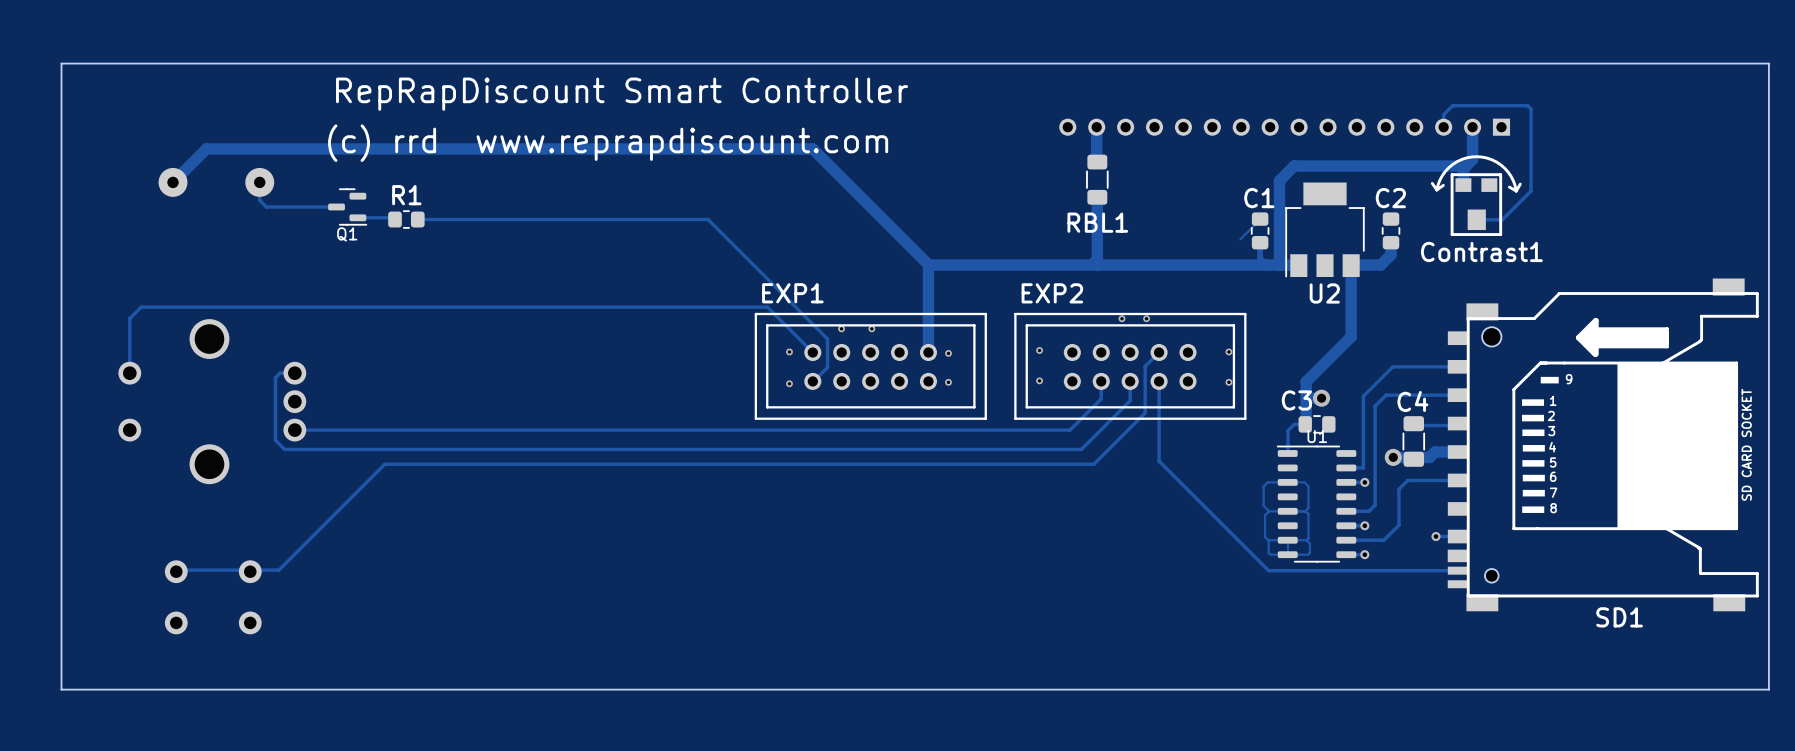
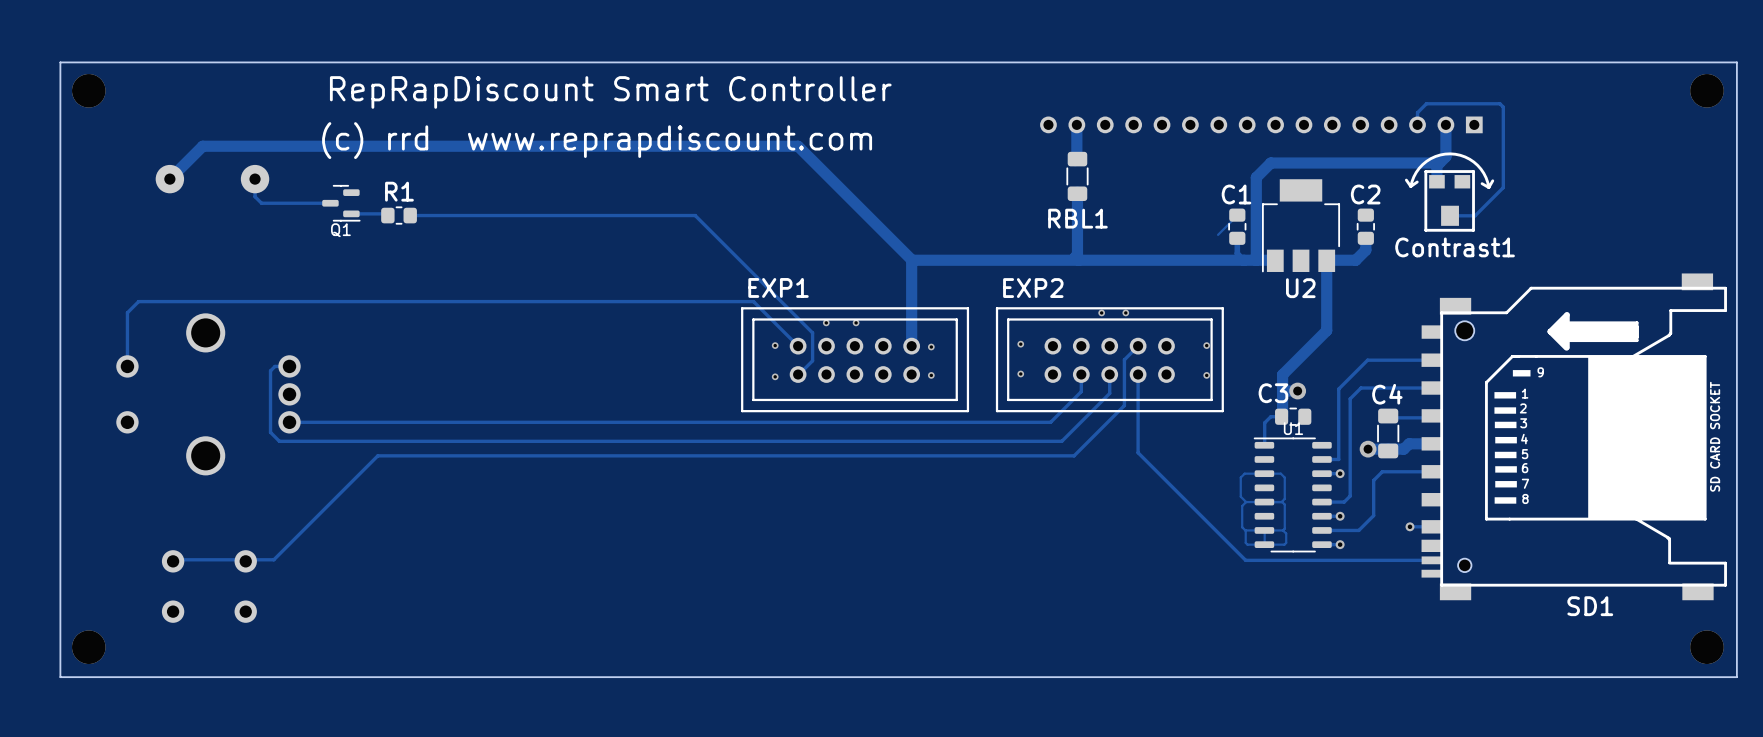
part: none -> (88, 90)
part: none -> (1706, 90)
part: none -> (88, 647)
part: none -> (1706, 647)

